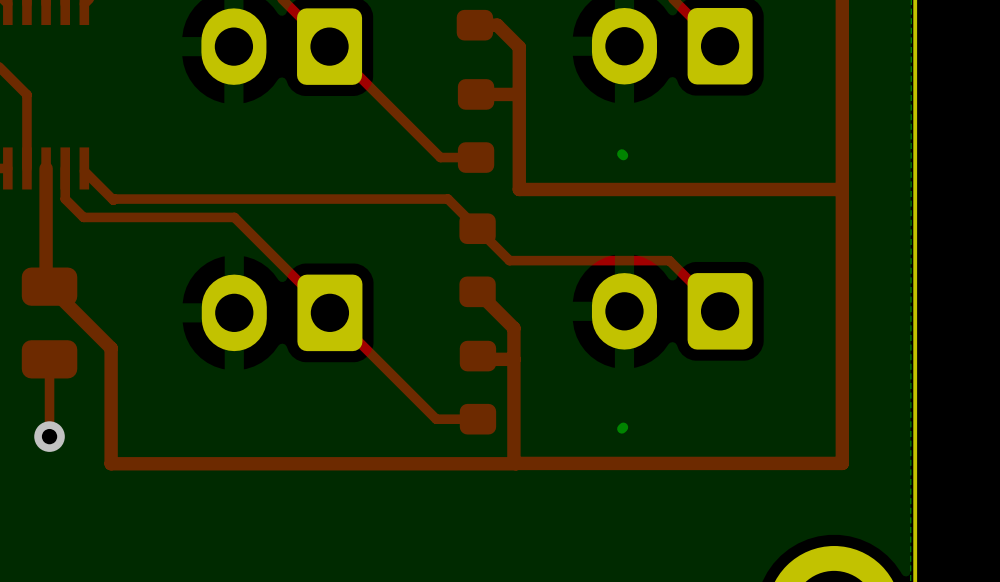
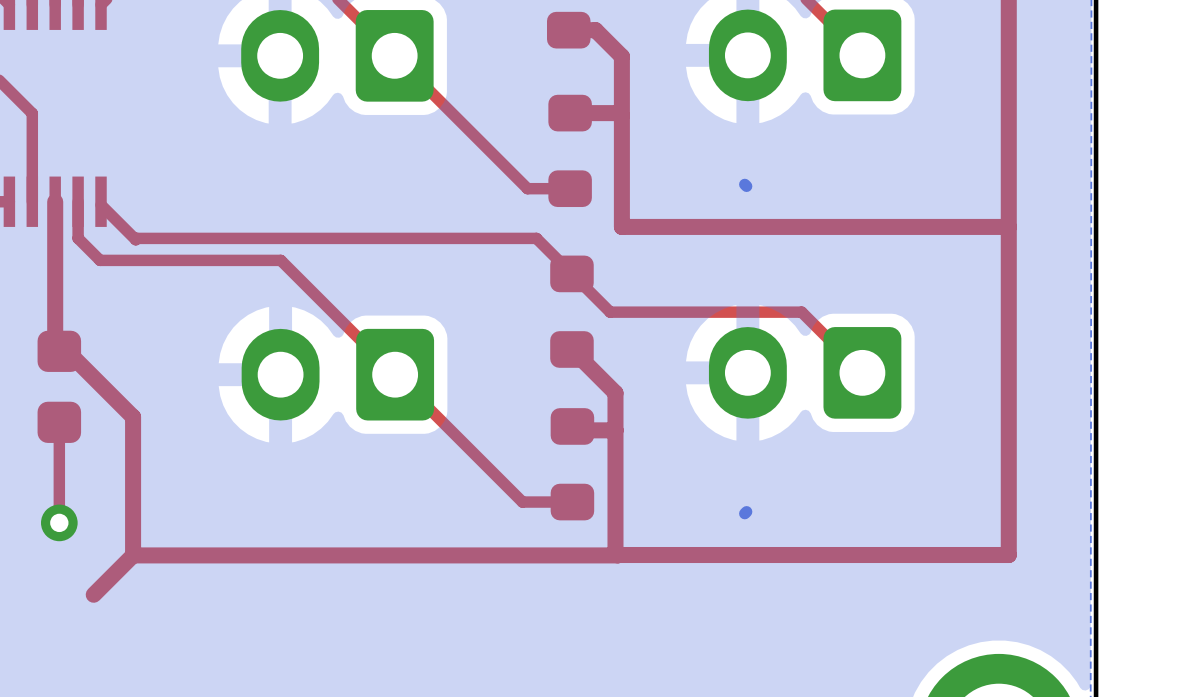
part footprint: [21, 267, 78, 379] -> [37, 330, 82, 443]
top track: none -> (133, 555) (93, 594)

